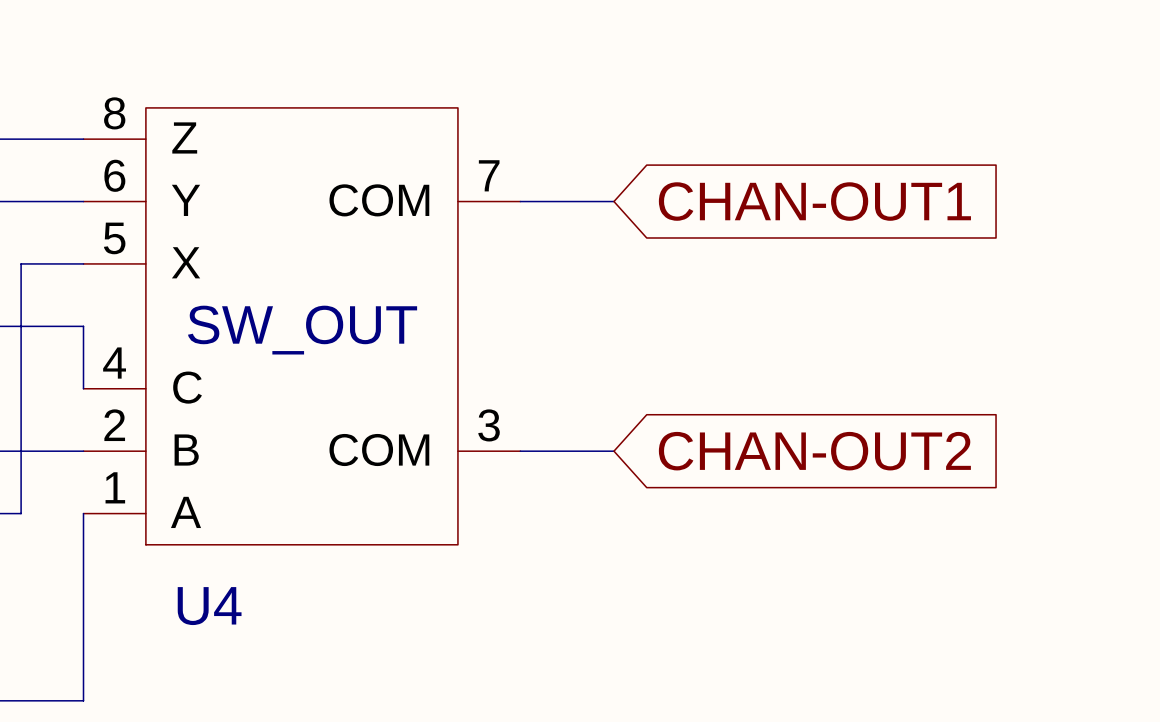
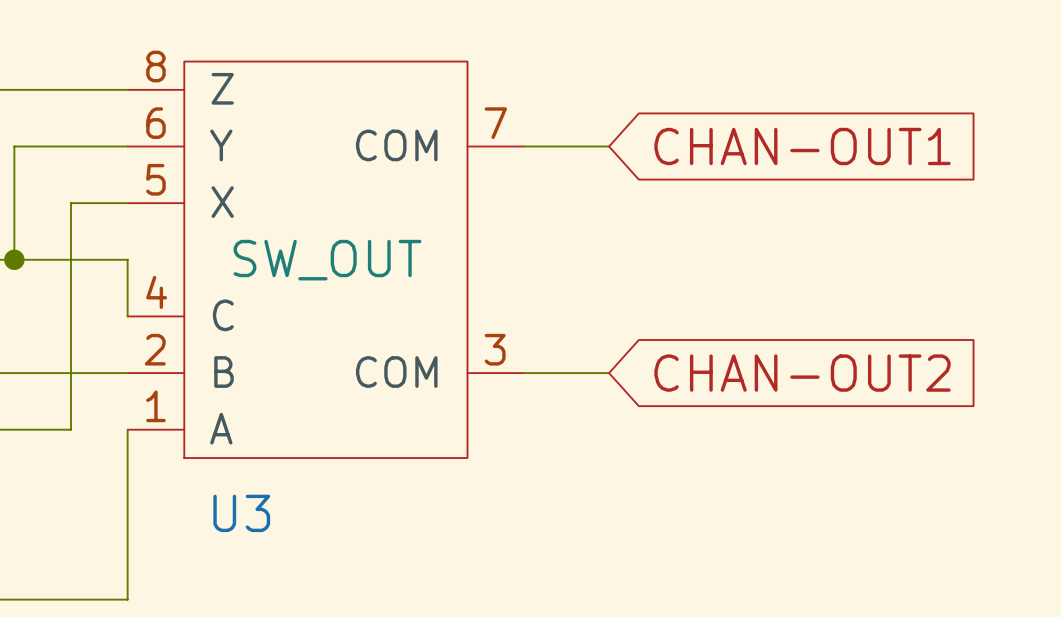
U4 name: U4 (209, 606) -> U3 (241, 513)

